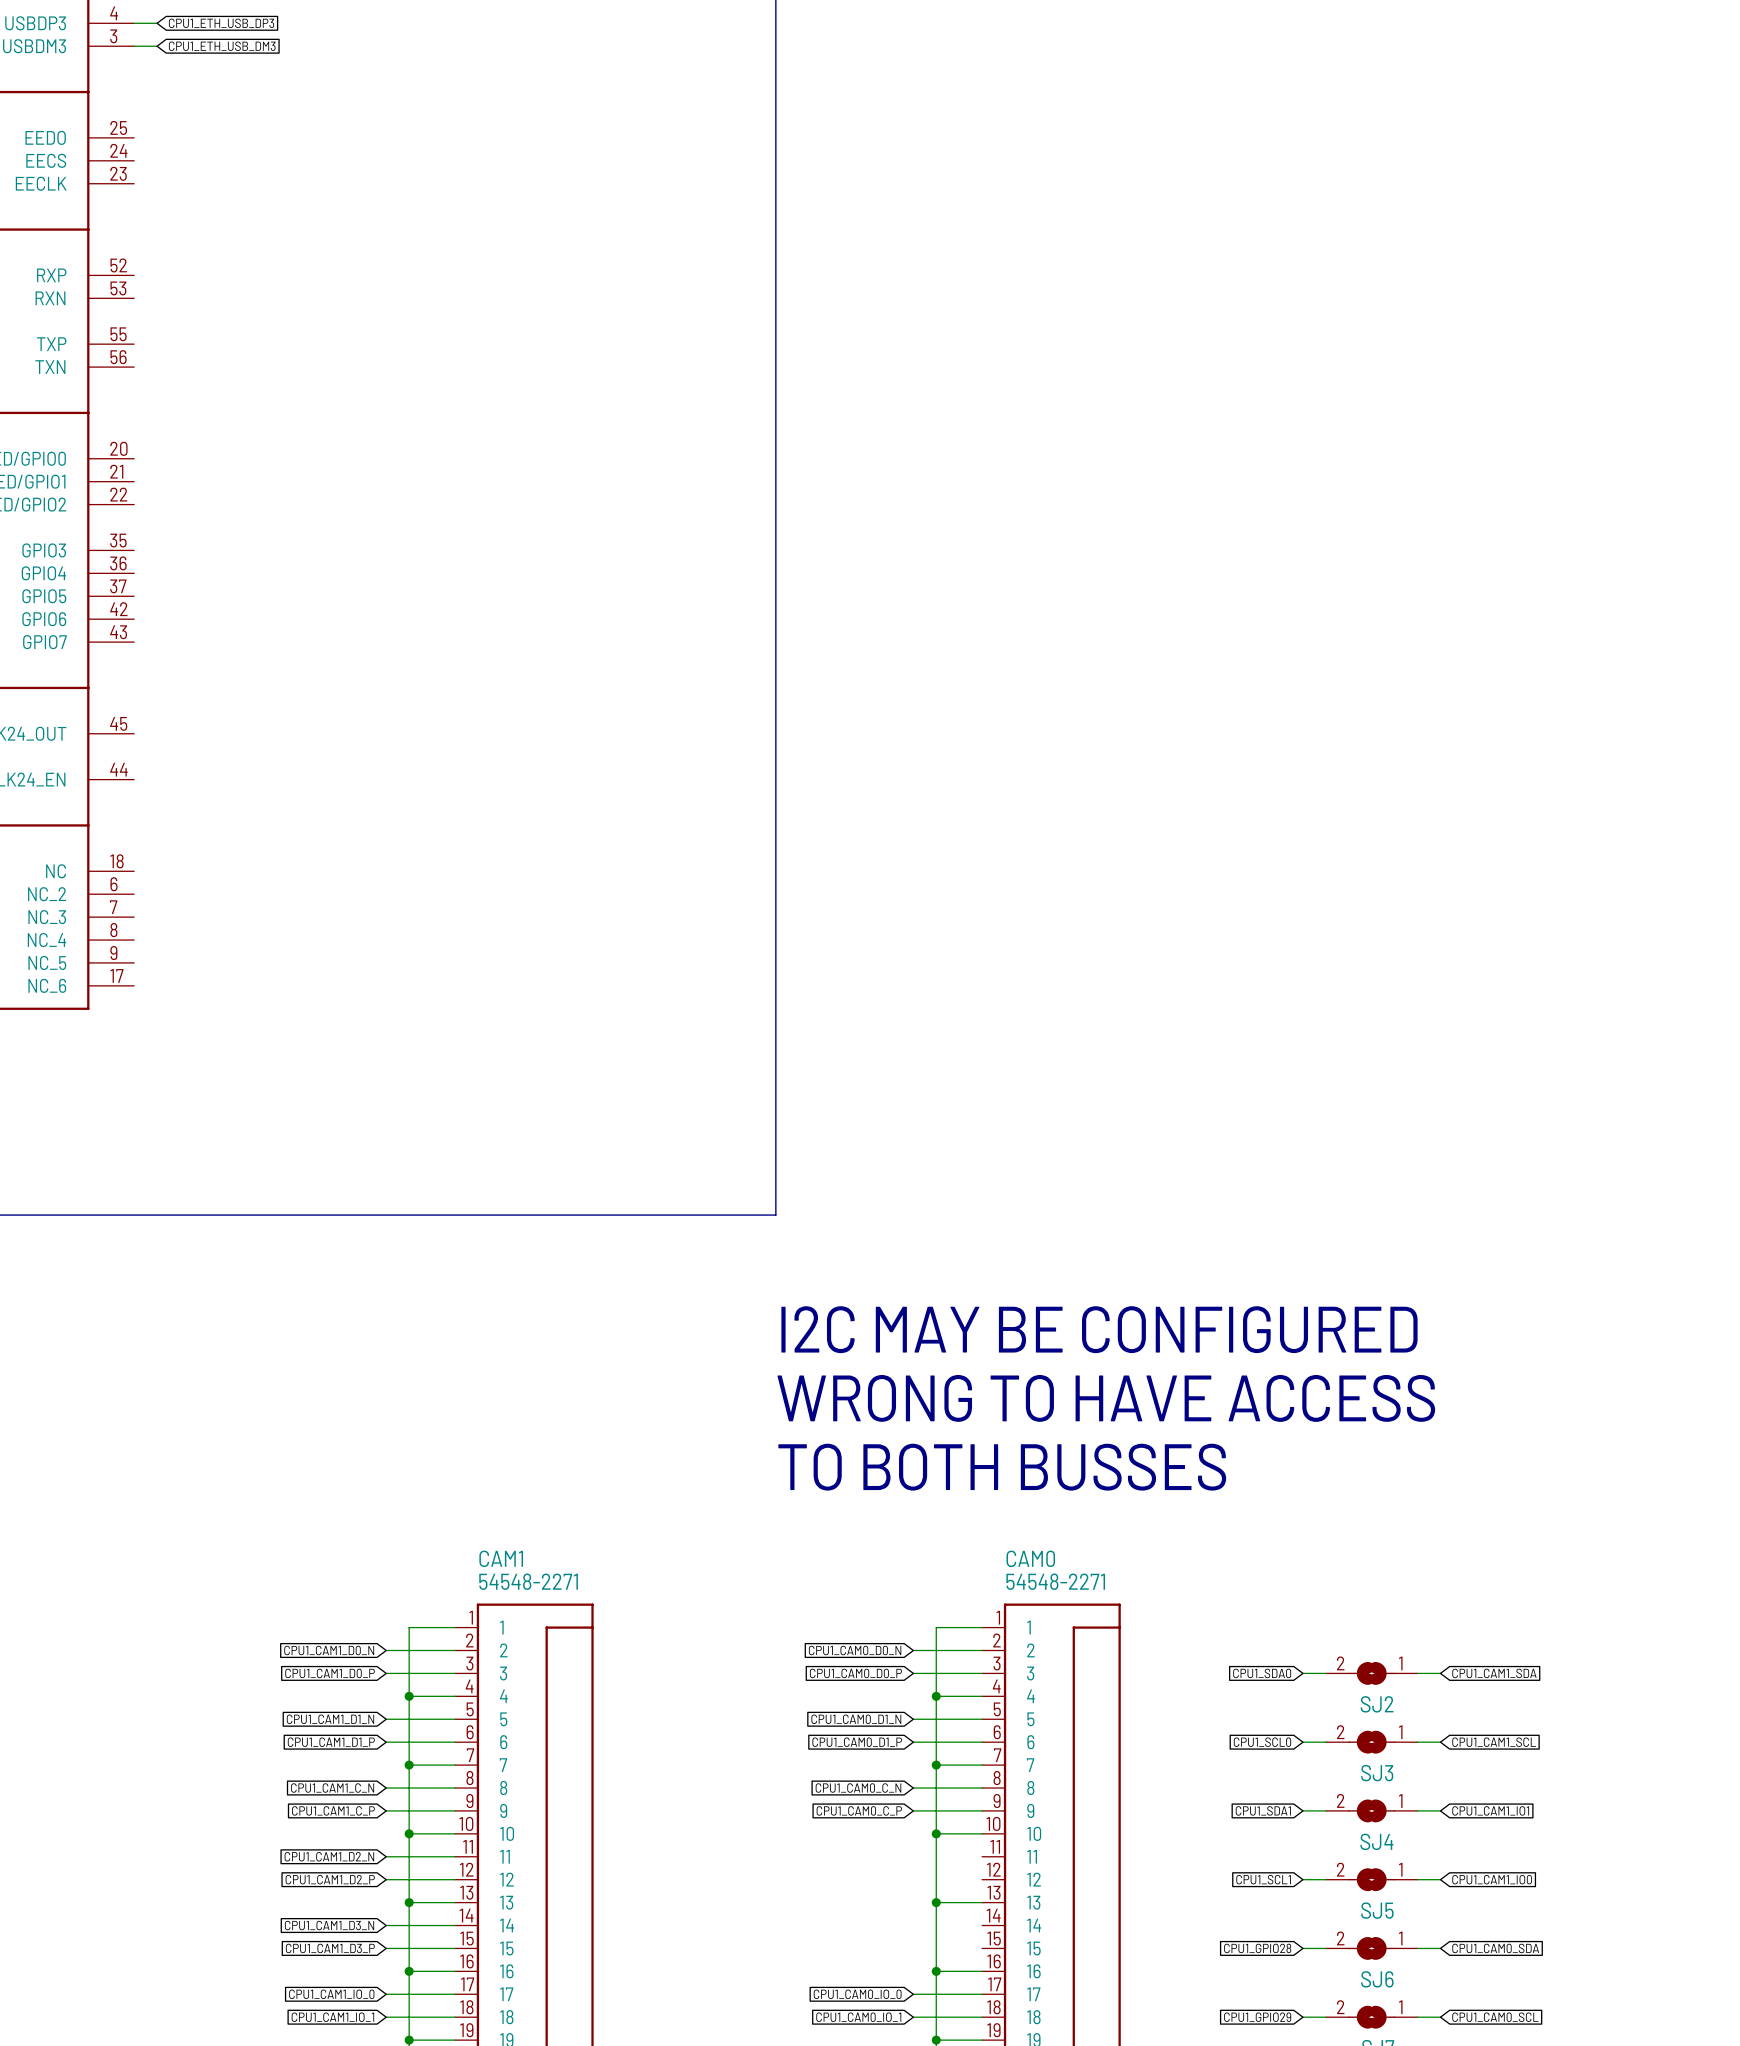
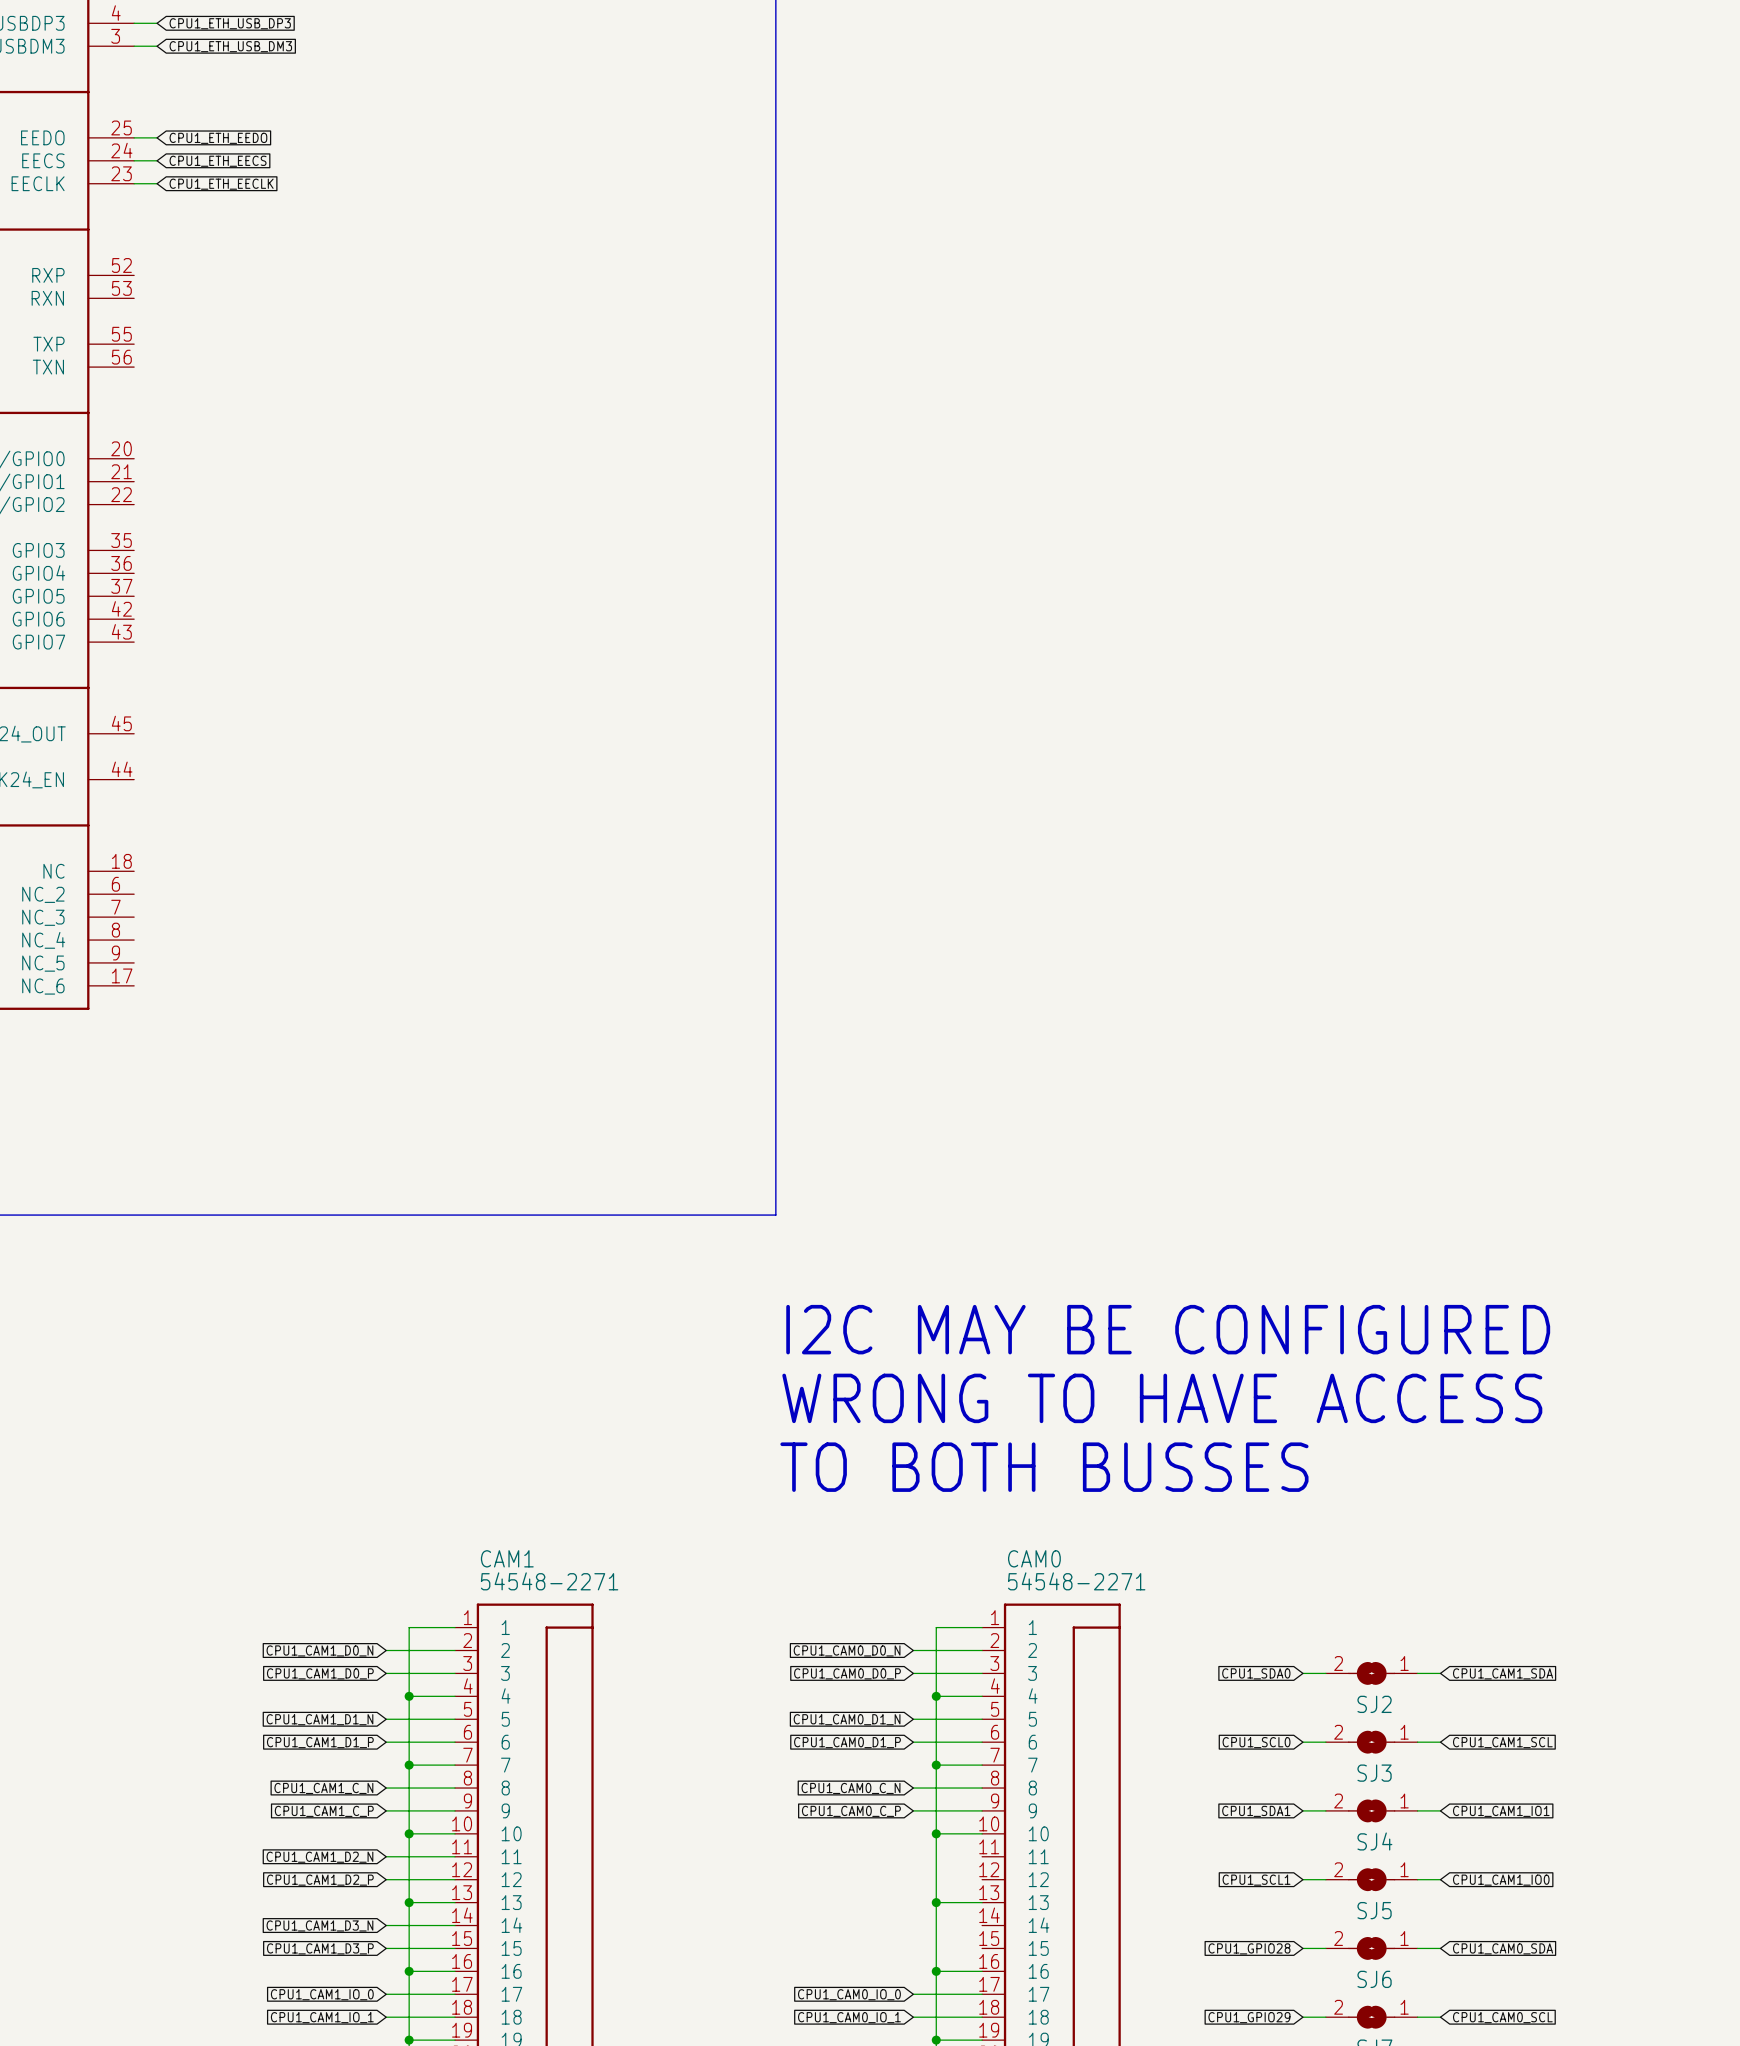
wire: none -> (134, 137) (157, 137)
global label: none -> CPU1_ETH_EEDO (218, 138)
wire: none -> (134, 160) (157, 160)
global label: none -> CPU1_ETH_EECS (218, 161)
wire: none -> (134, 183) (157, 183)
global label: none -> CPU1_ETH_EECLK (221, 184)

